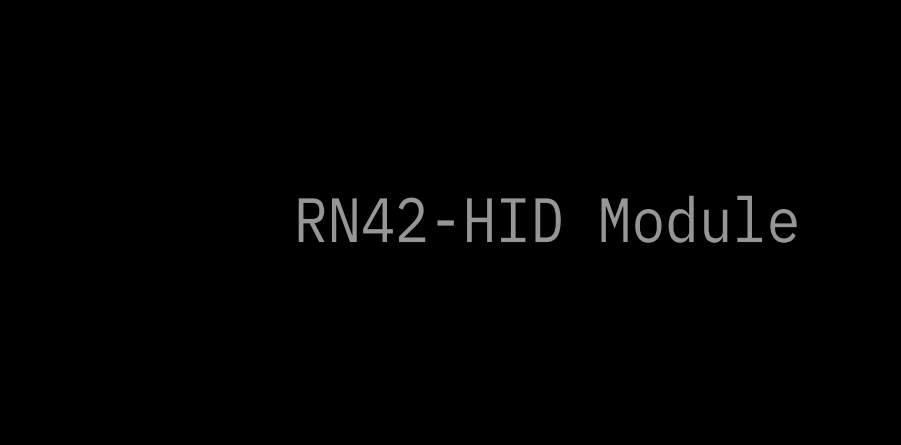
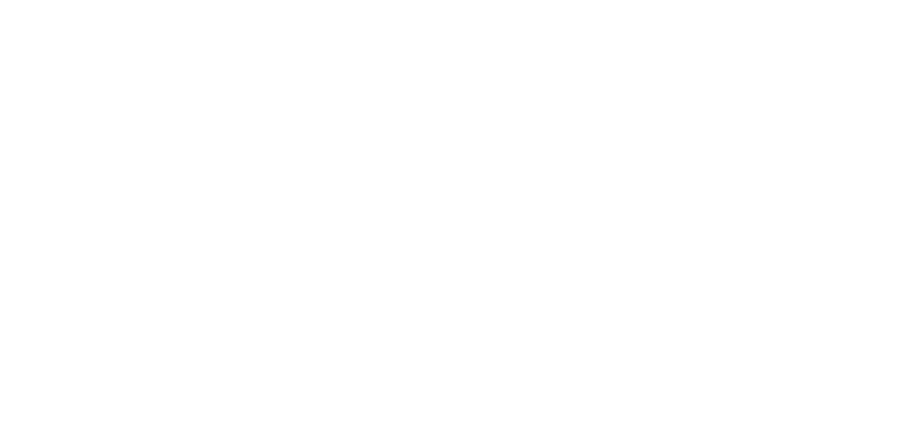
text: RN42-HID Module (547, 219) -> none

